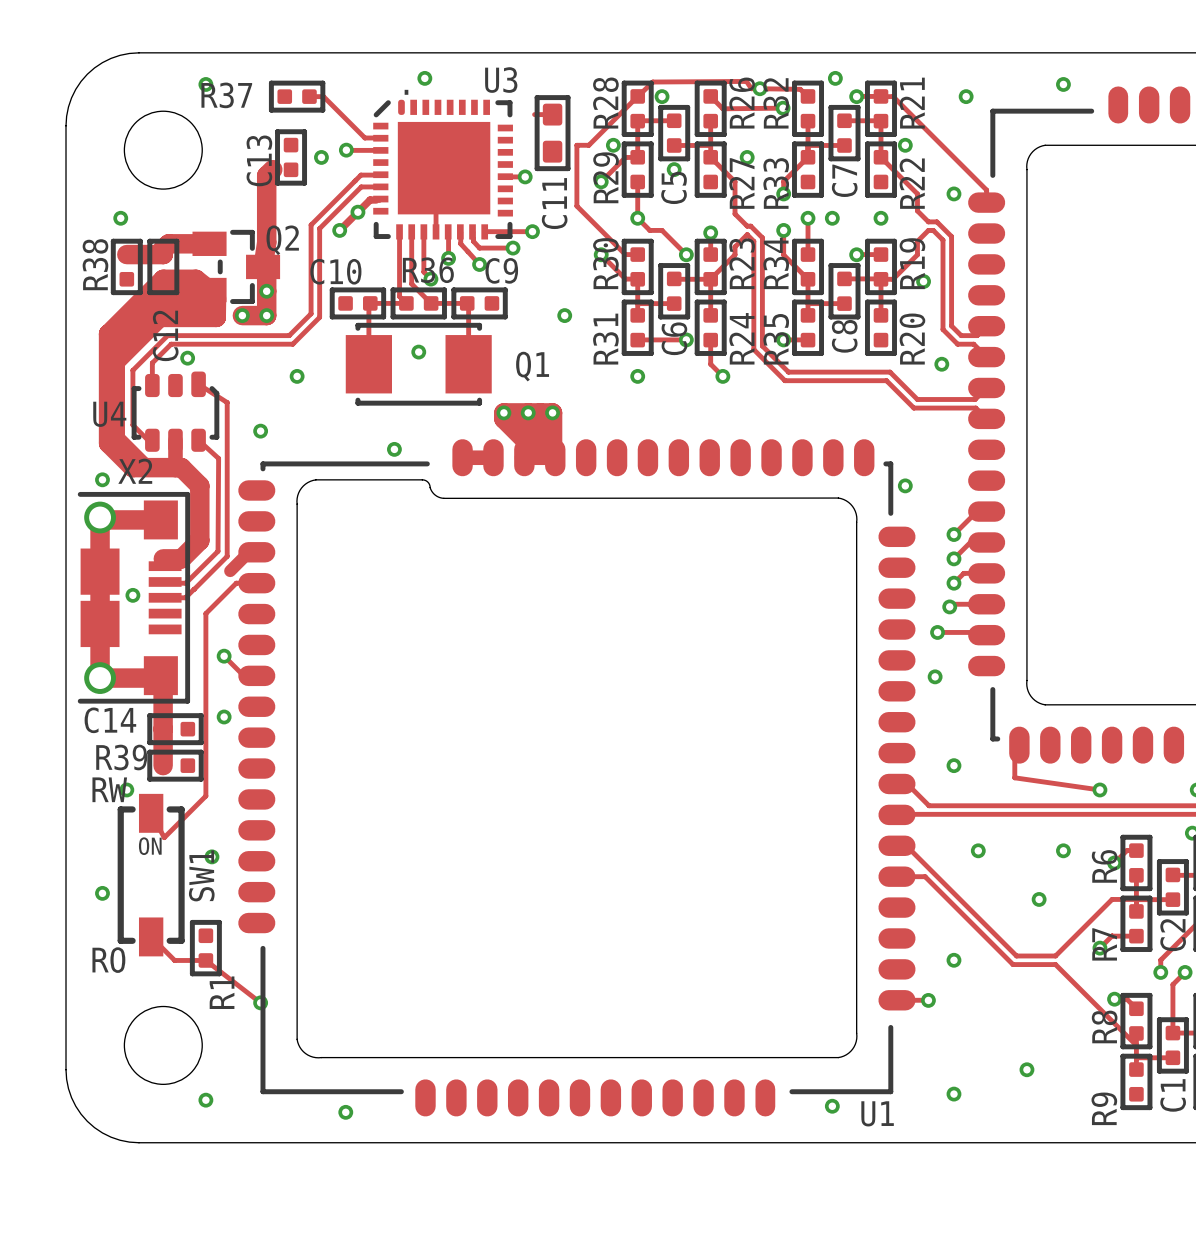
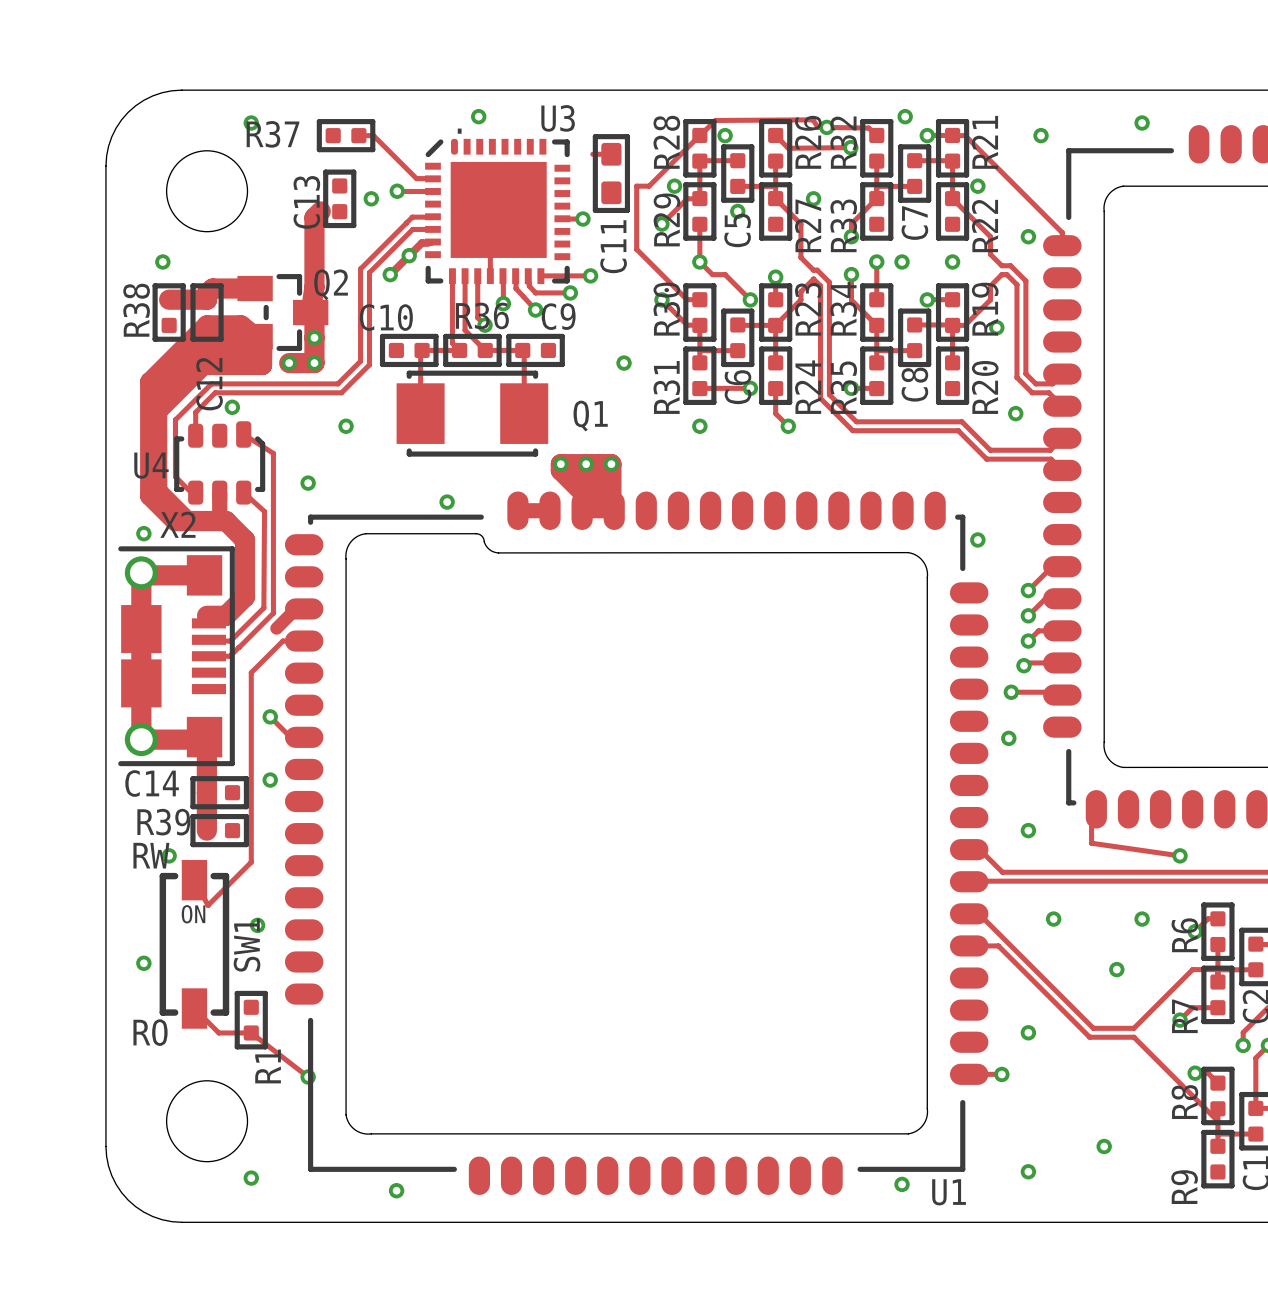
via: (418, 352) -> none
via: (132, 595) -> none

